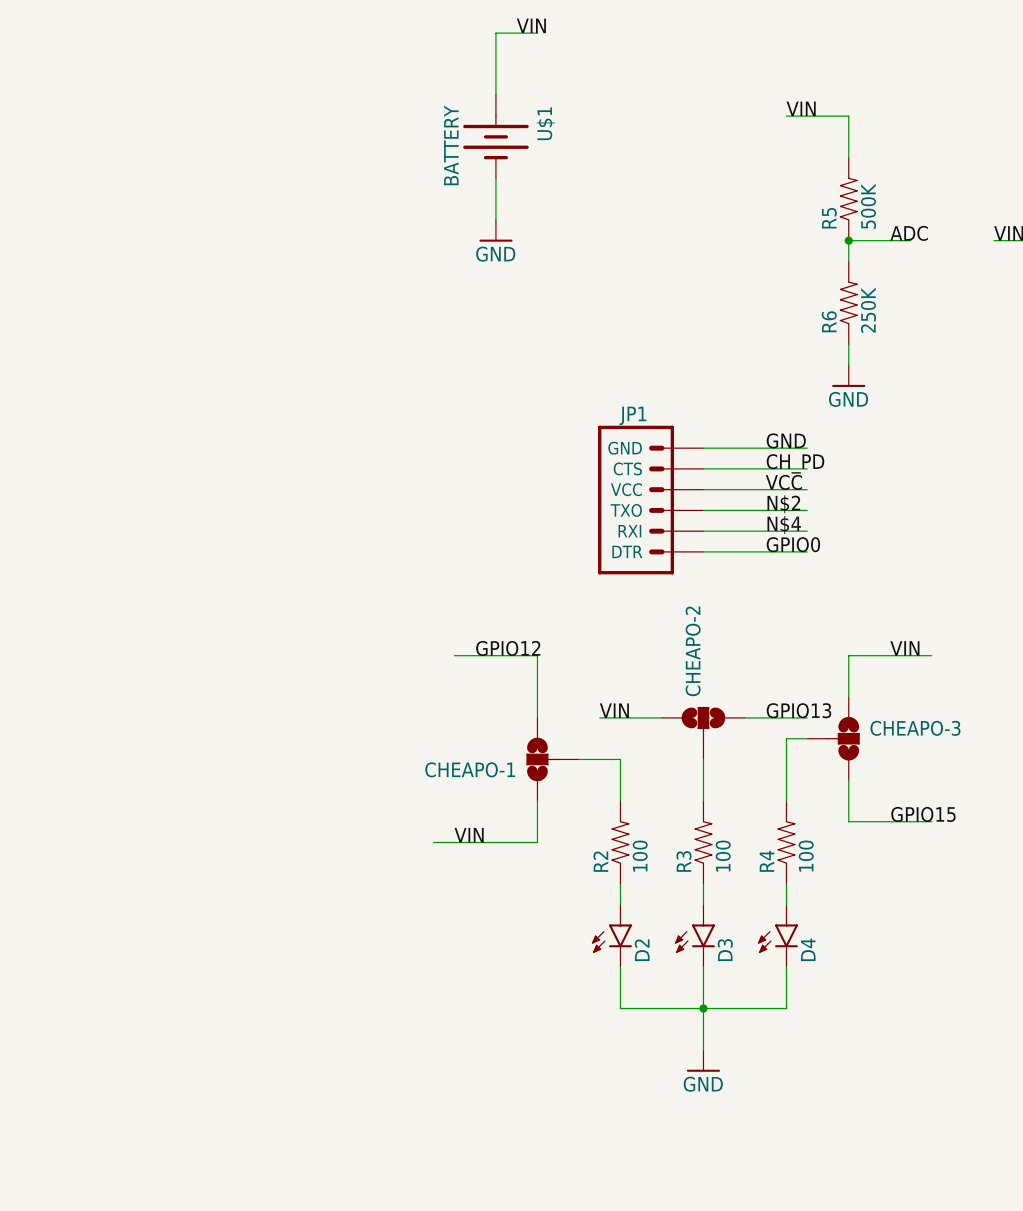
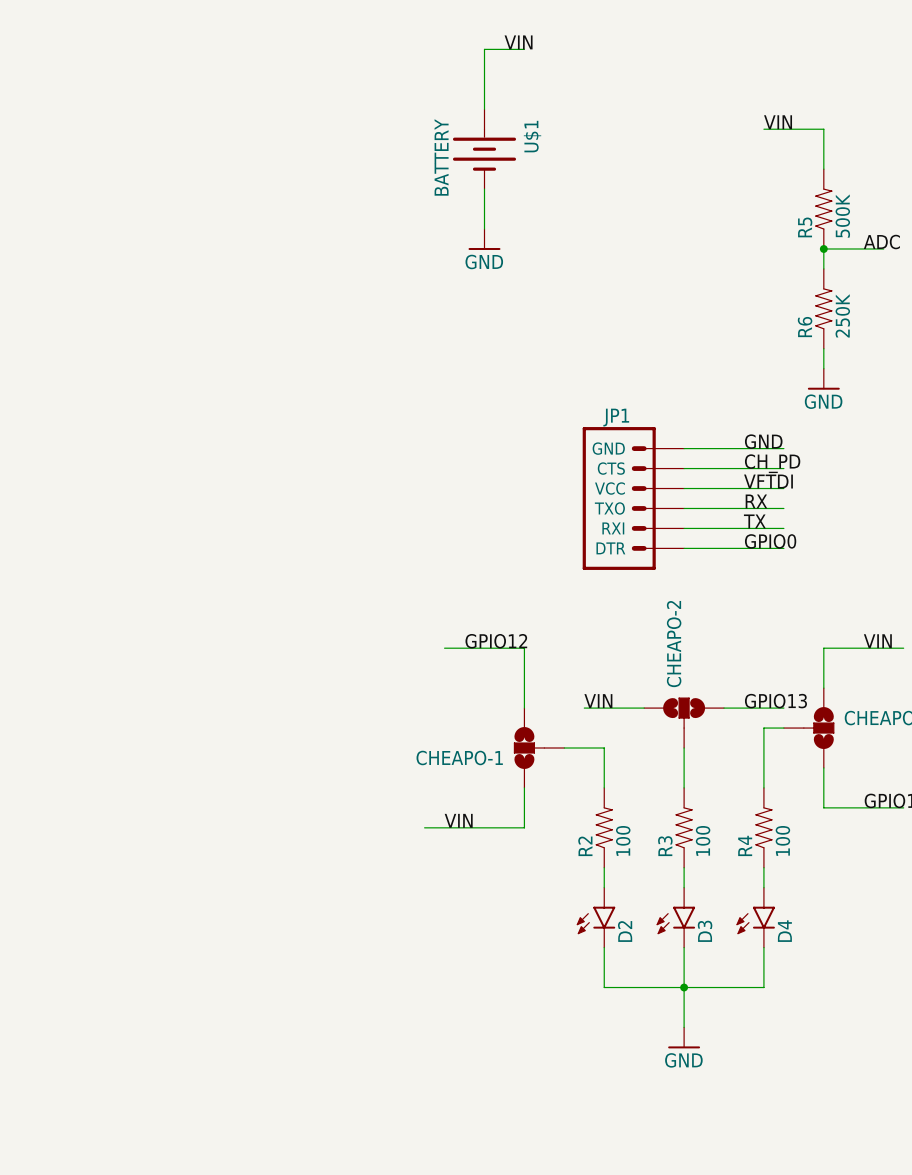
label: VCC (783, 482) -> VFTDI (768, 481)
label: N$2 (783, 504) -> RX (756, 501)
label: N$4 (784, 525) -> TX (754, 521)

